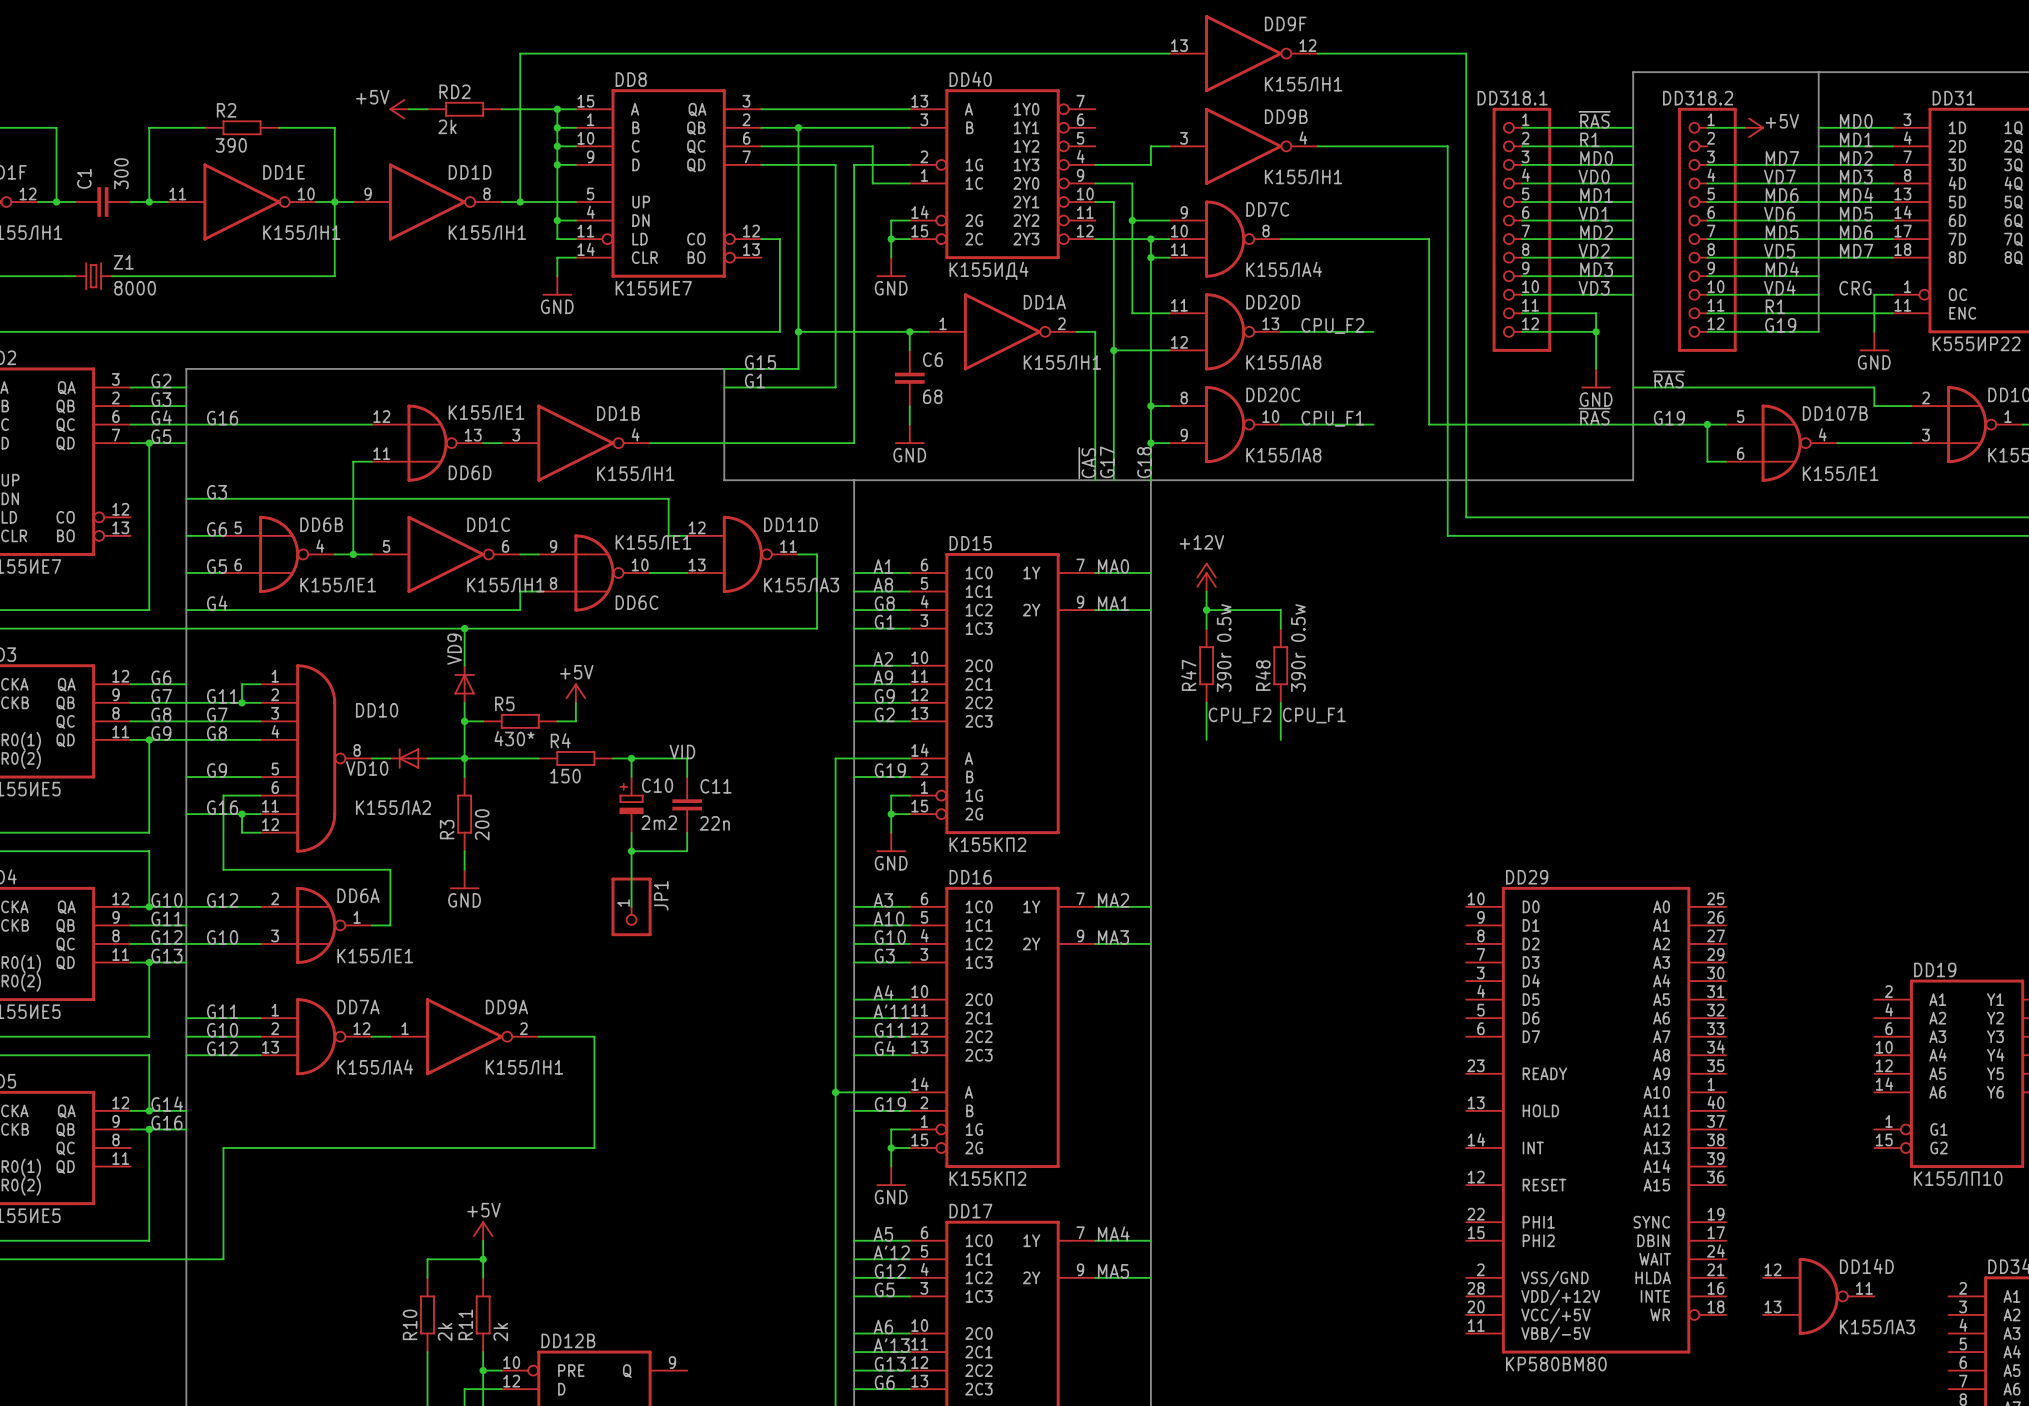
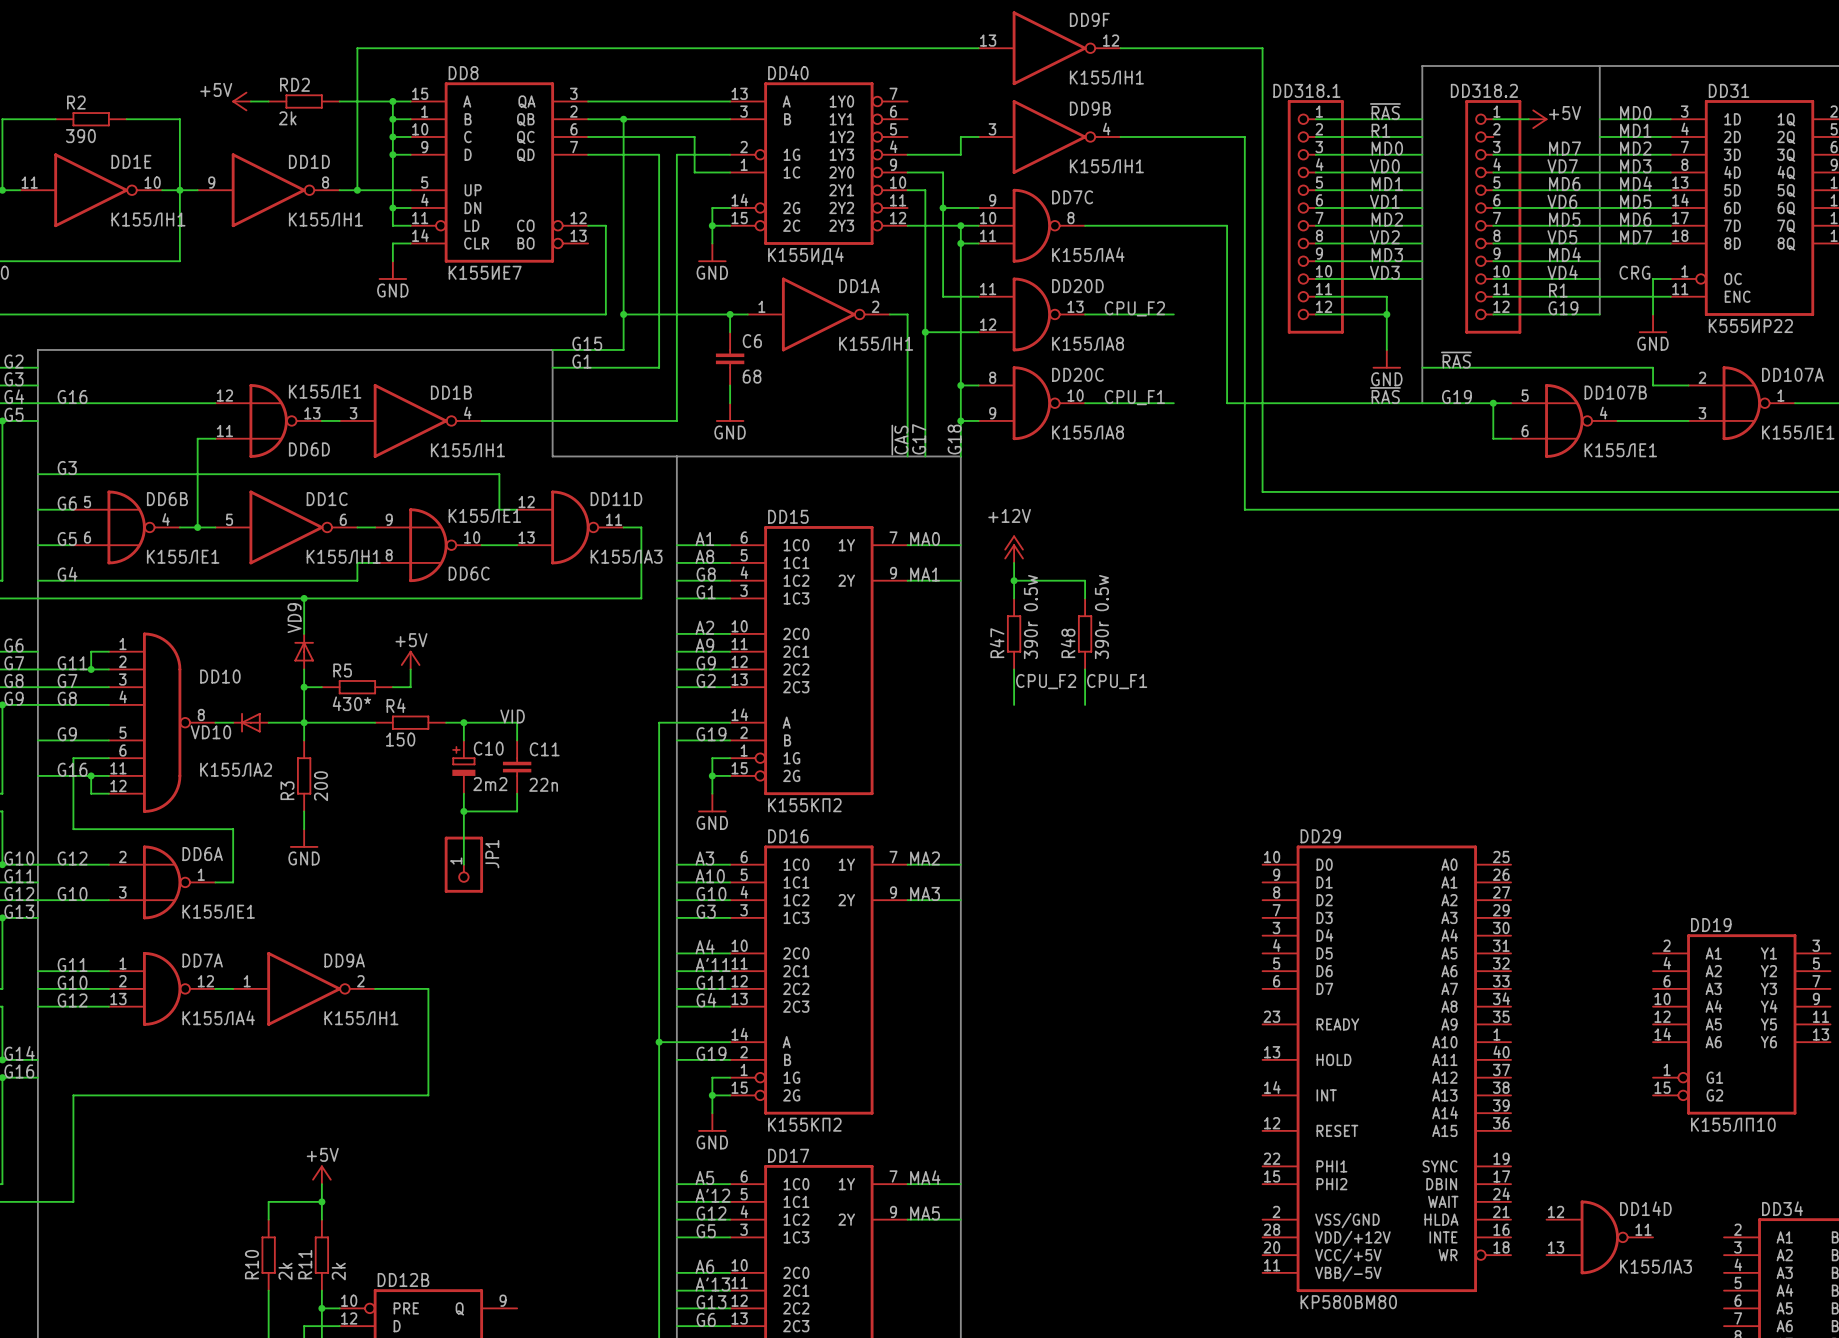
bus: (1633, 424) (1633, 480) (1150, 480) -> none

